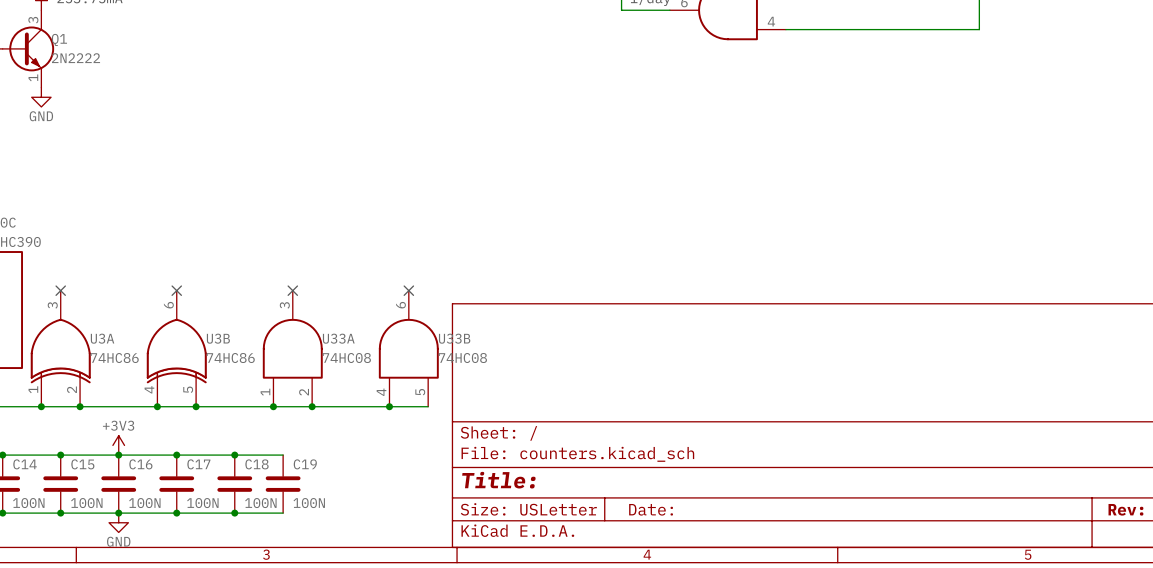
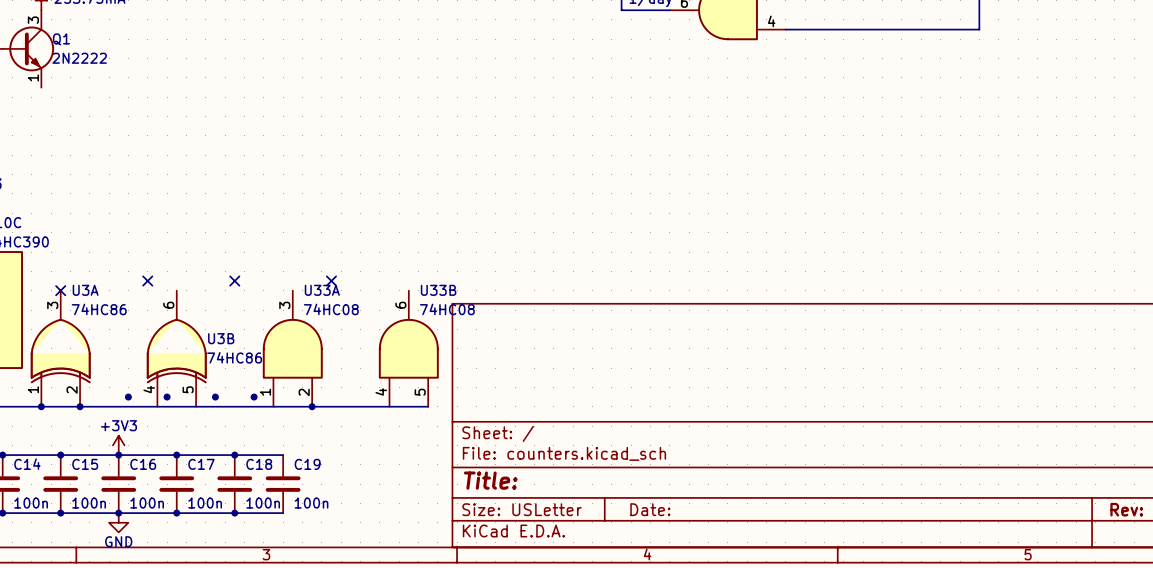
power symbol: GND (41, 97) -> none
no-connect mark: none -> (147, 281)
no-connect mark: none -> (234, 281)
no-connect mark: none -> (331, 281)
no-connect mark: (176, 290) -> none
no-connect mark: (292, 290) -> none
no-connect mark: (408, 290) -> none
U3A name position: U3A (102, 338) -> U3A (85, 290)
U33A name position: U33A (338, 338) -> U33A (322, 290)
U33B name position: U33B (454, 338) -> U33B (438, 290)
U3A value position: 74HC86 (114, 358) -> 74HC86 (99, 309)
U33A value position: 74HC08 (346, 358) -> 74HC08 (331, 309)
U33B value position: 74HC08 (462, 358) -> 74HC08 (447, 309)
junction: none -> (128, 397)
junction: none -> (215, 397)
junction position: (157, 406) -> (167, 397)
junction: (196, 406) -> none
junction position: (273, 406) -> (254, 397)
junction: (389, 406) -> none
C14 value: 100N (28, 503) -> 100n (31, 503)
C15 value: 100N (86, 503) -> 100n (89, 503)
C16 value: 100N (144, 503) -> 100n (147, 503)
C17 value: 100N (202, 503) -> 100n (205, 503)
C18 value: 100N (260, 503) -> 100n (263, 503)
C19 value: 100N (309, 503) -> 100n (311, 503)

